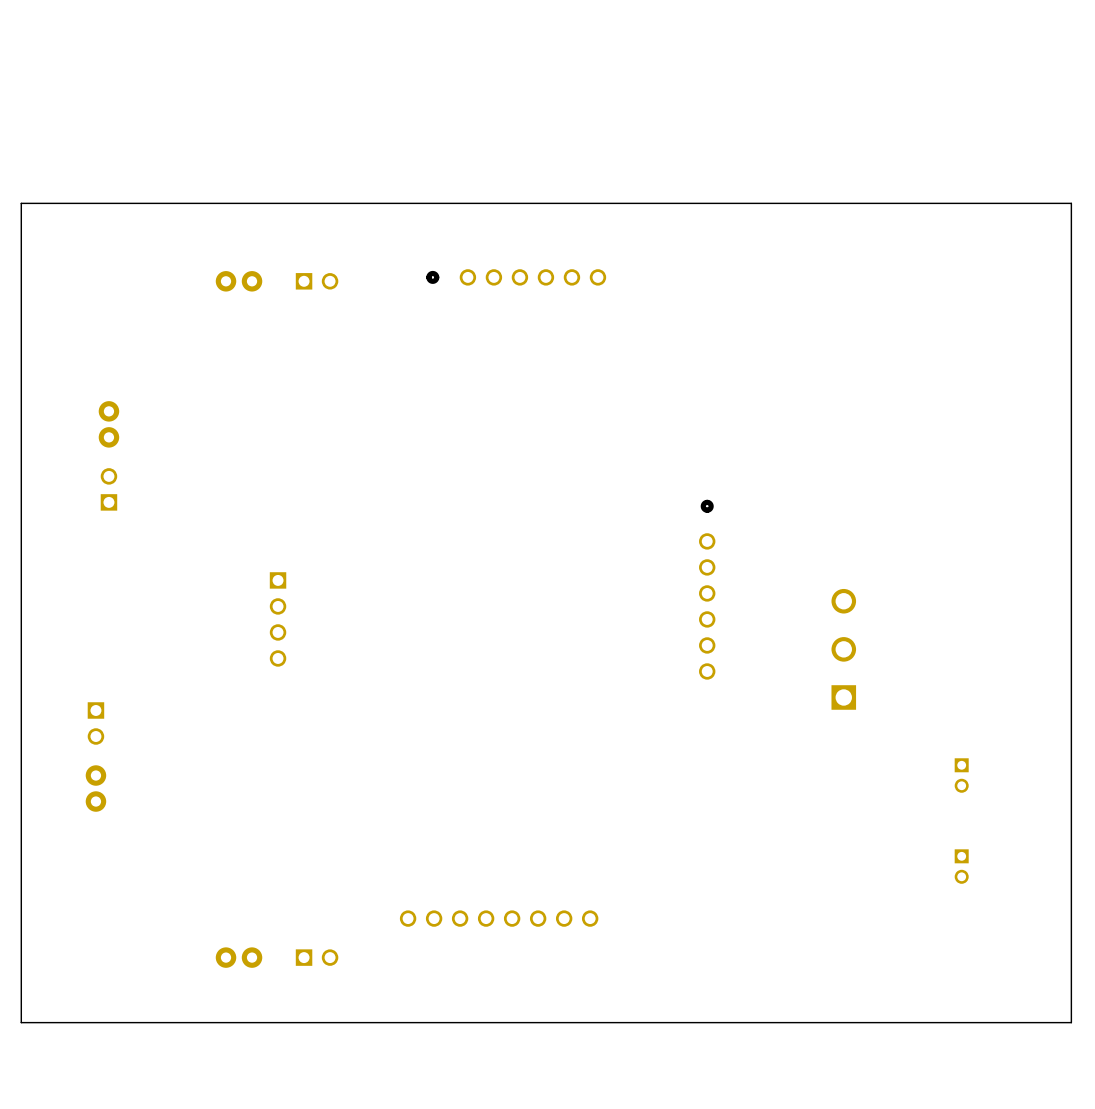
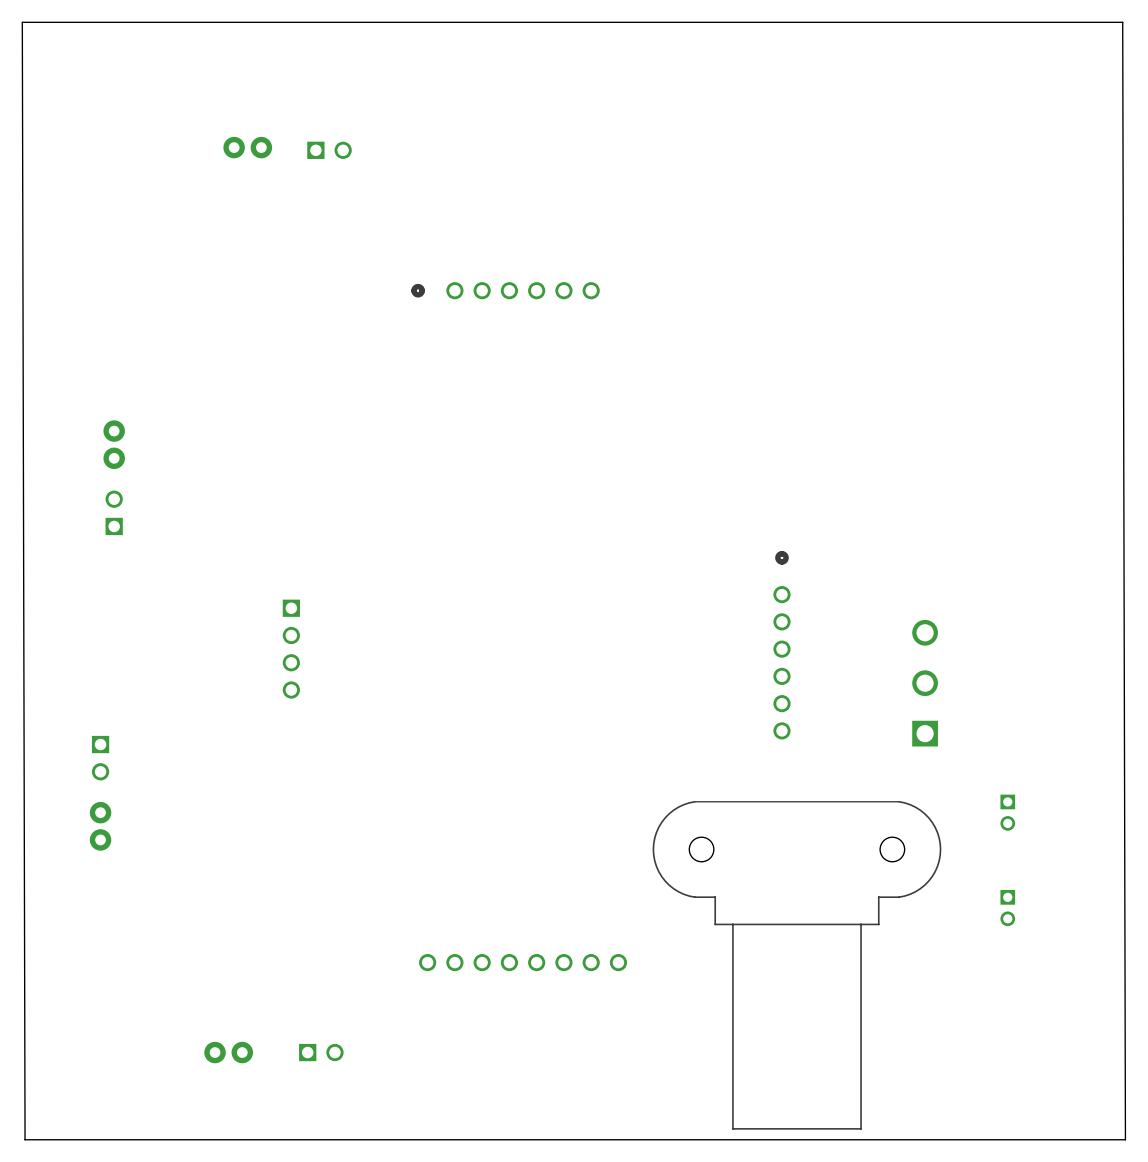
board edge: (1071, 203) (21, 203) (21, 1022) (1071, 1022) (1071, 203) -> (1122, 22) (1125, 1139) (25, 1139) (22, 22) (1122, 22)
part position: (516, 277) -> (505, 290)
part position: (239, 281) -> (247, 147)
part position: (317, 281) -> (329, 150)
part position: (707, 589) -> (781, 645)
part position: (843, 649) -> (925, 683)
part: none -> (796, 965)
part position: (239, 957) -> (228, 1052)
part position: (317, 957) -> (321, 1052)

